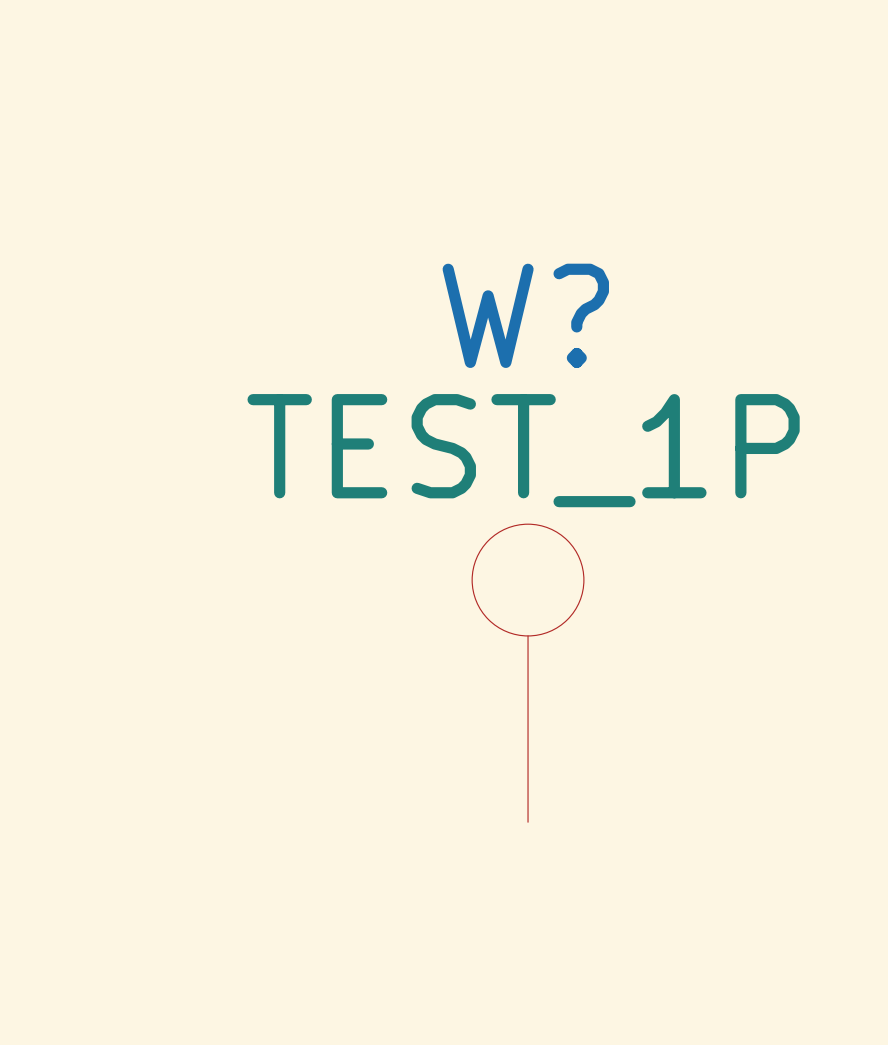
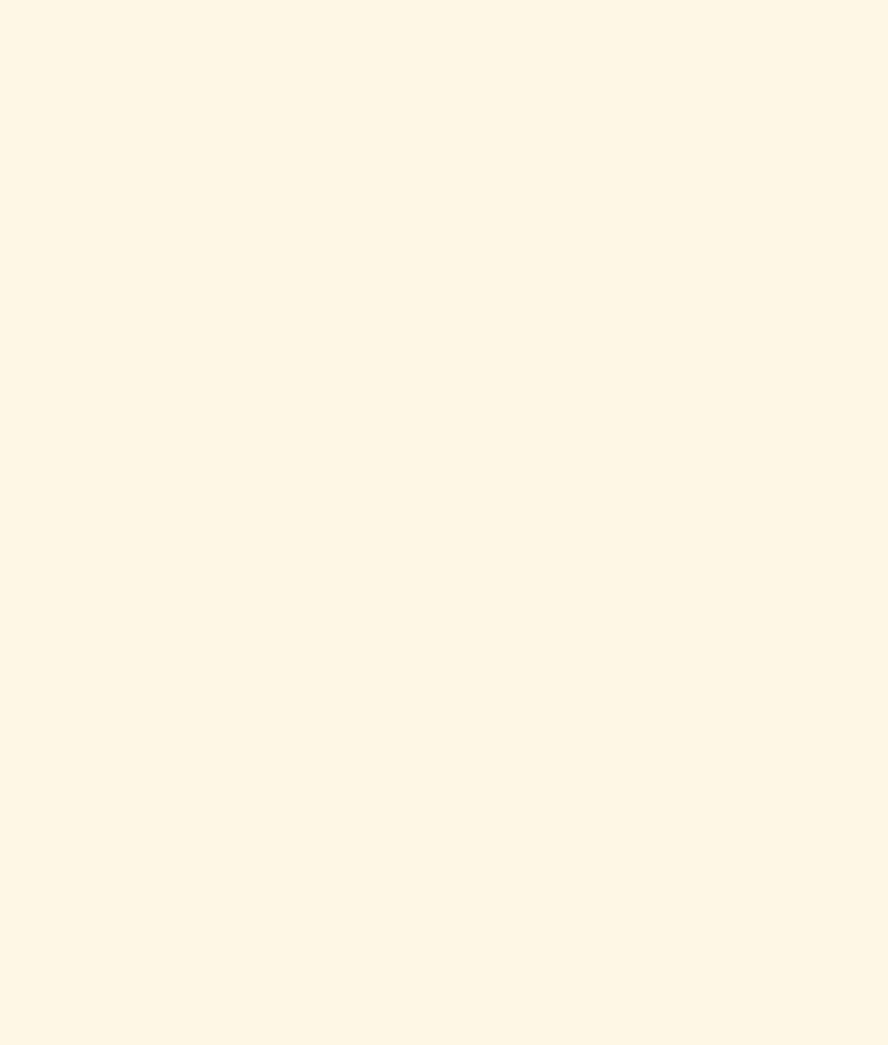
W?: TEST_1P (528, 673) -> none

